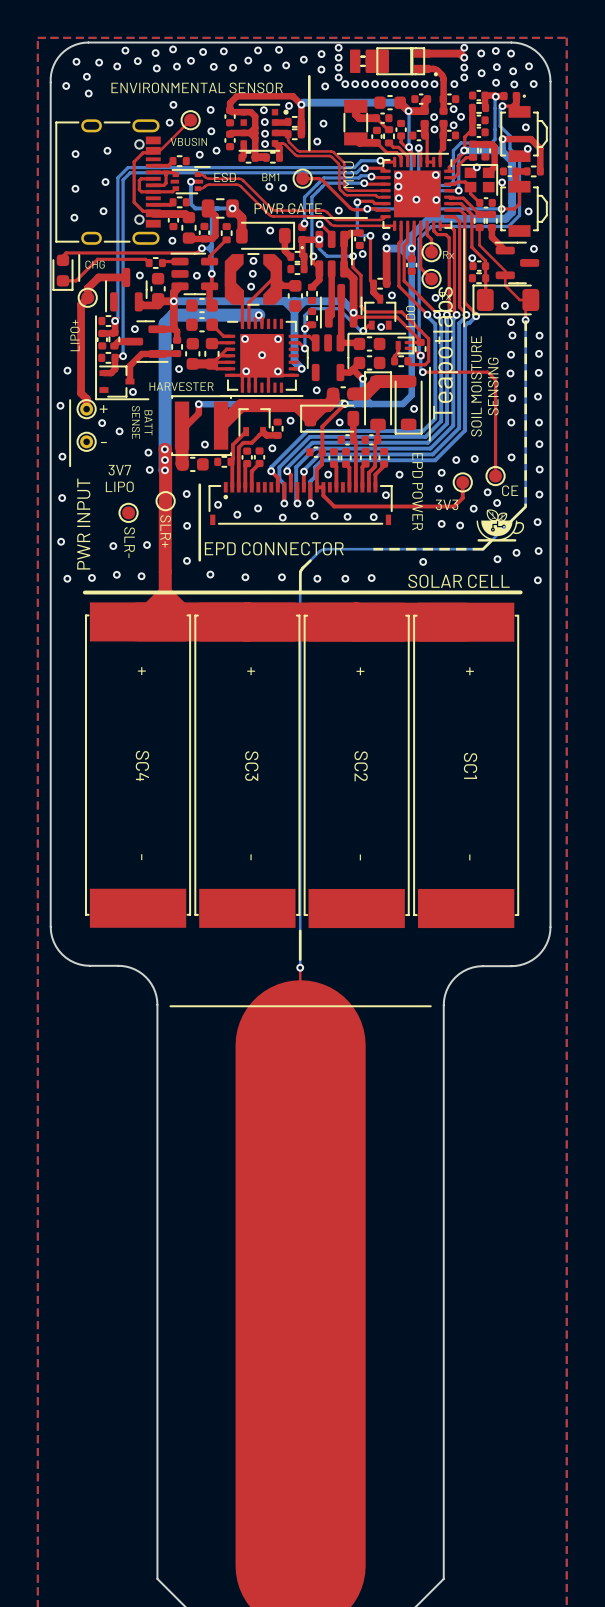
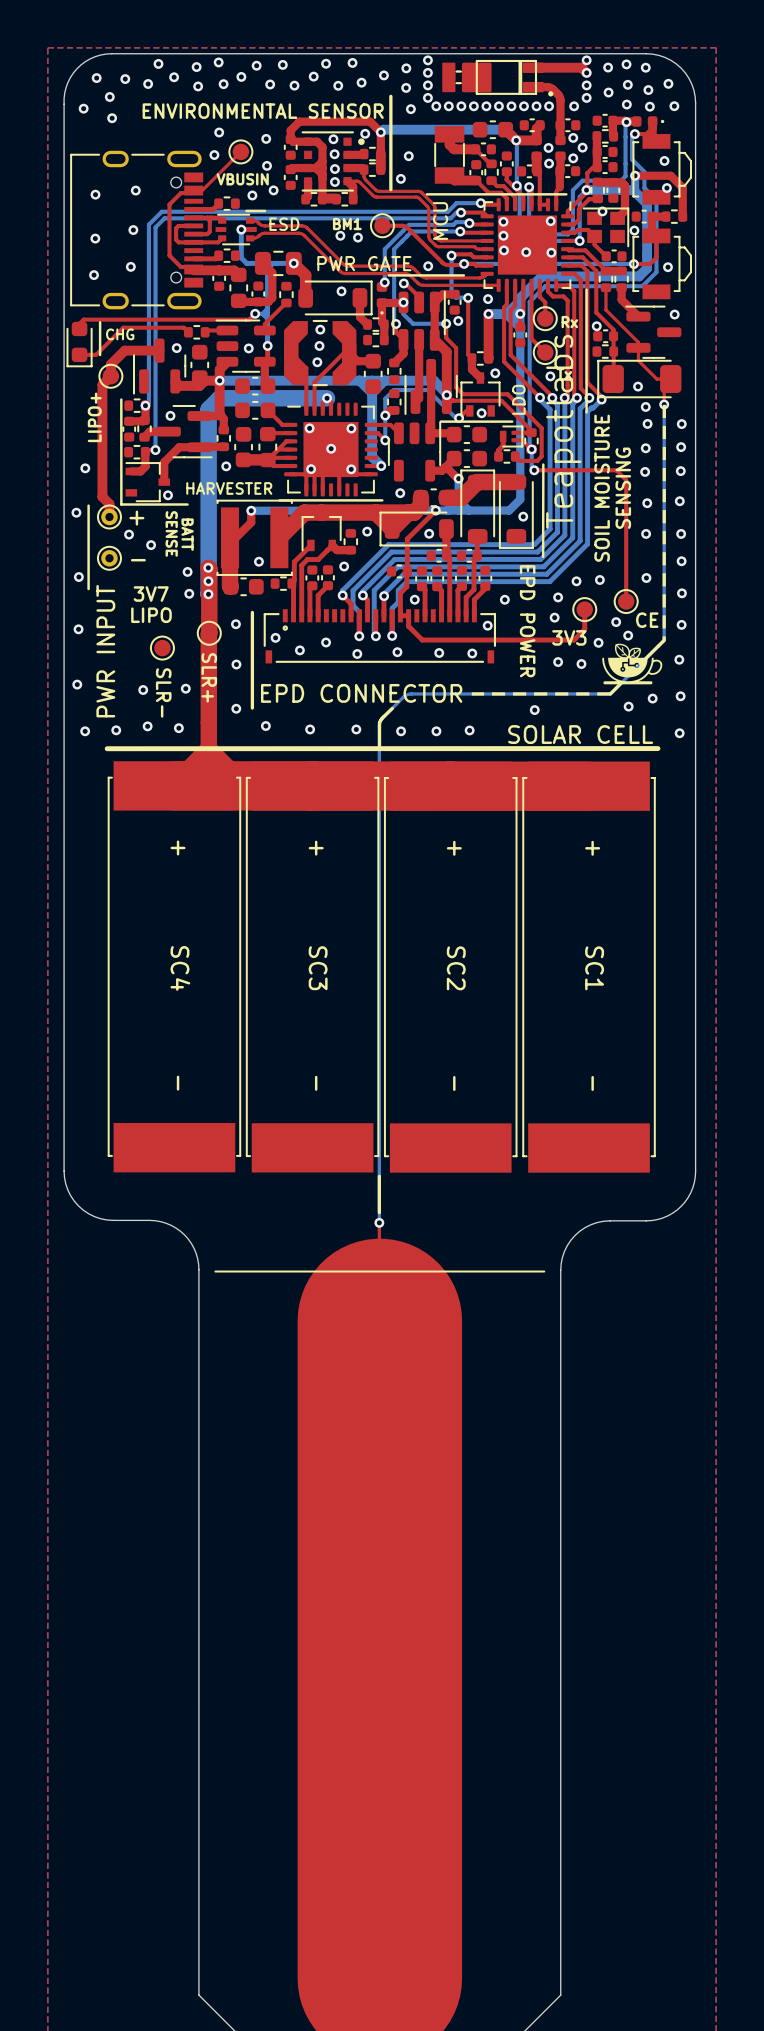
via: (172, 240) -> none

